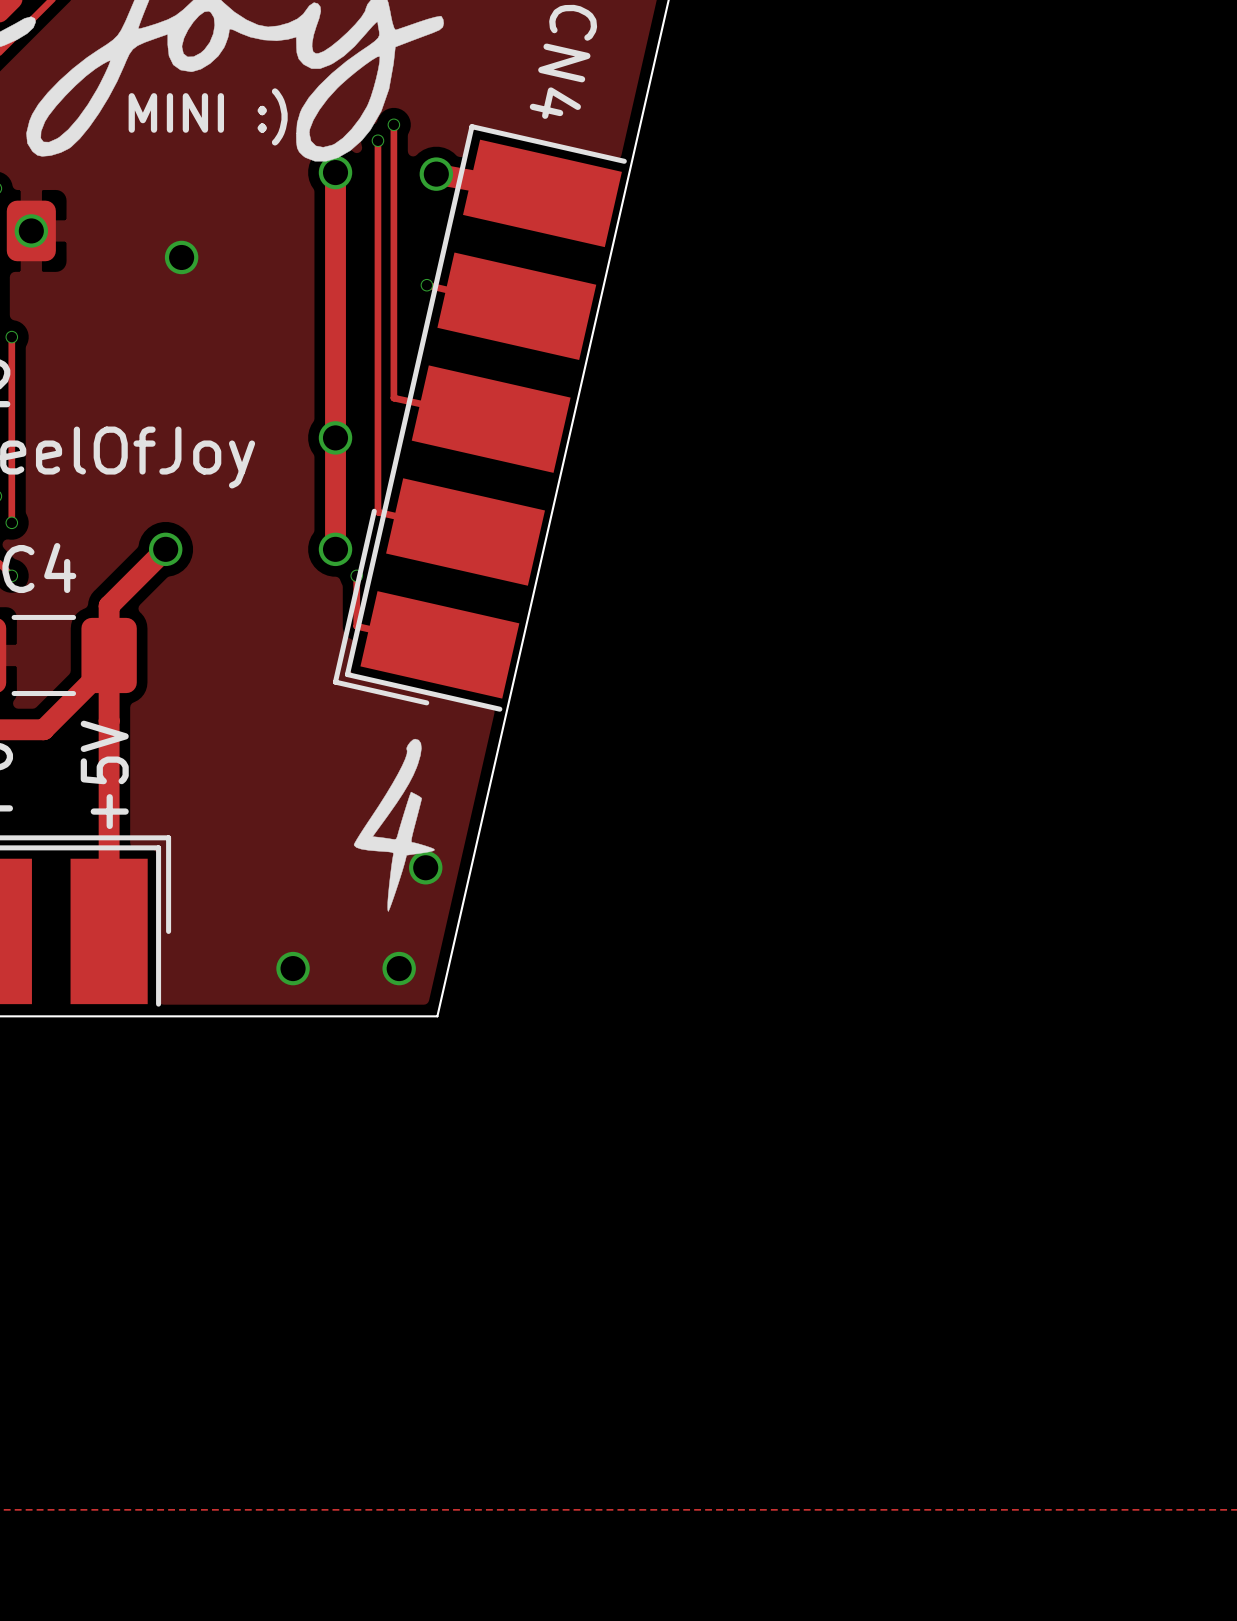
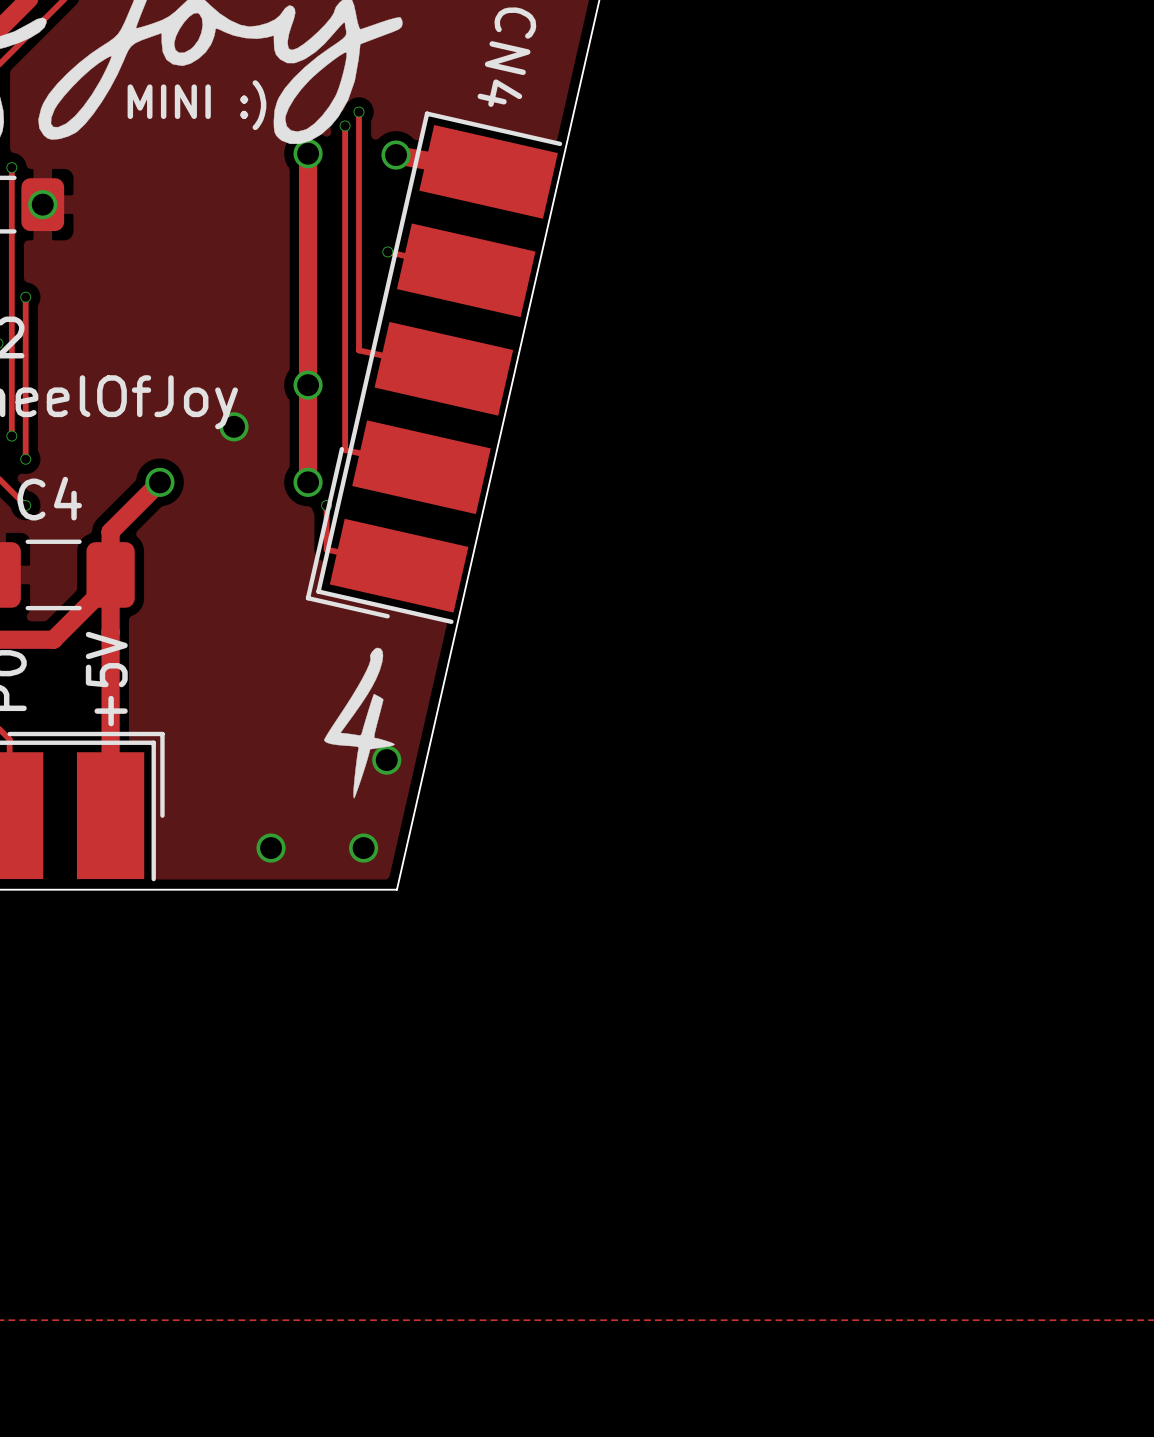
via position: (181, 257) -> (234, 426)

